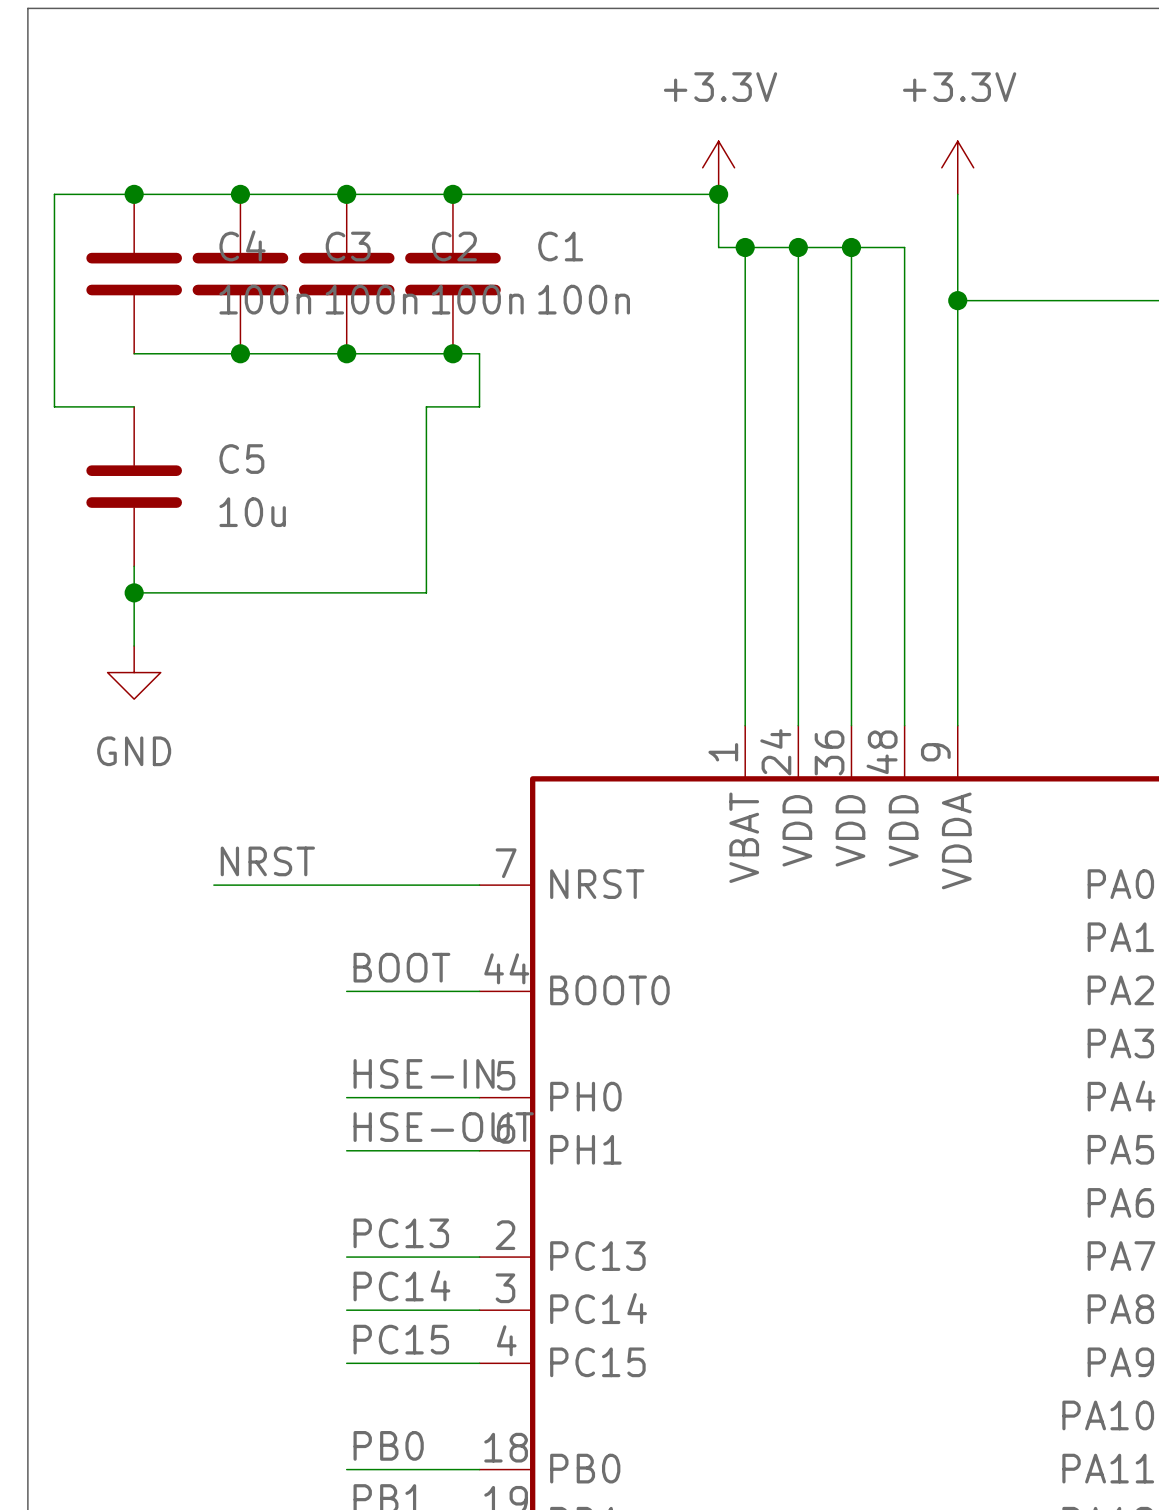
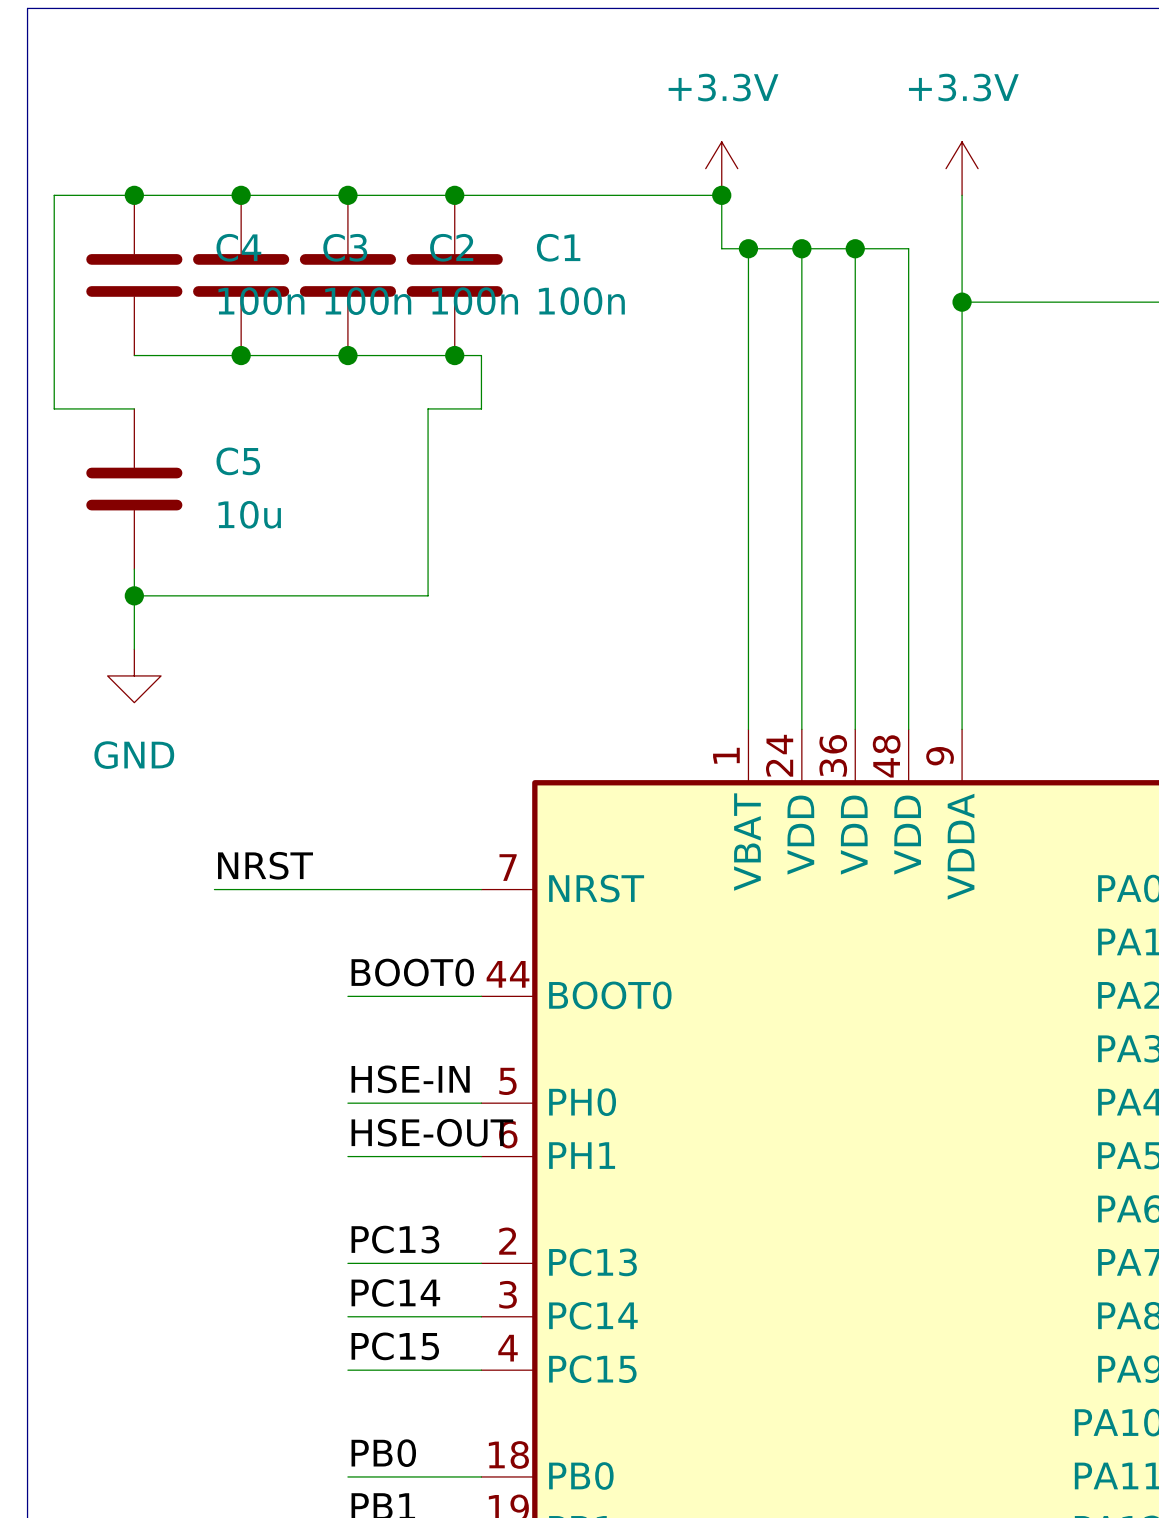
label: BOOT (401, 967) -> BOOT0 (412, 972)

